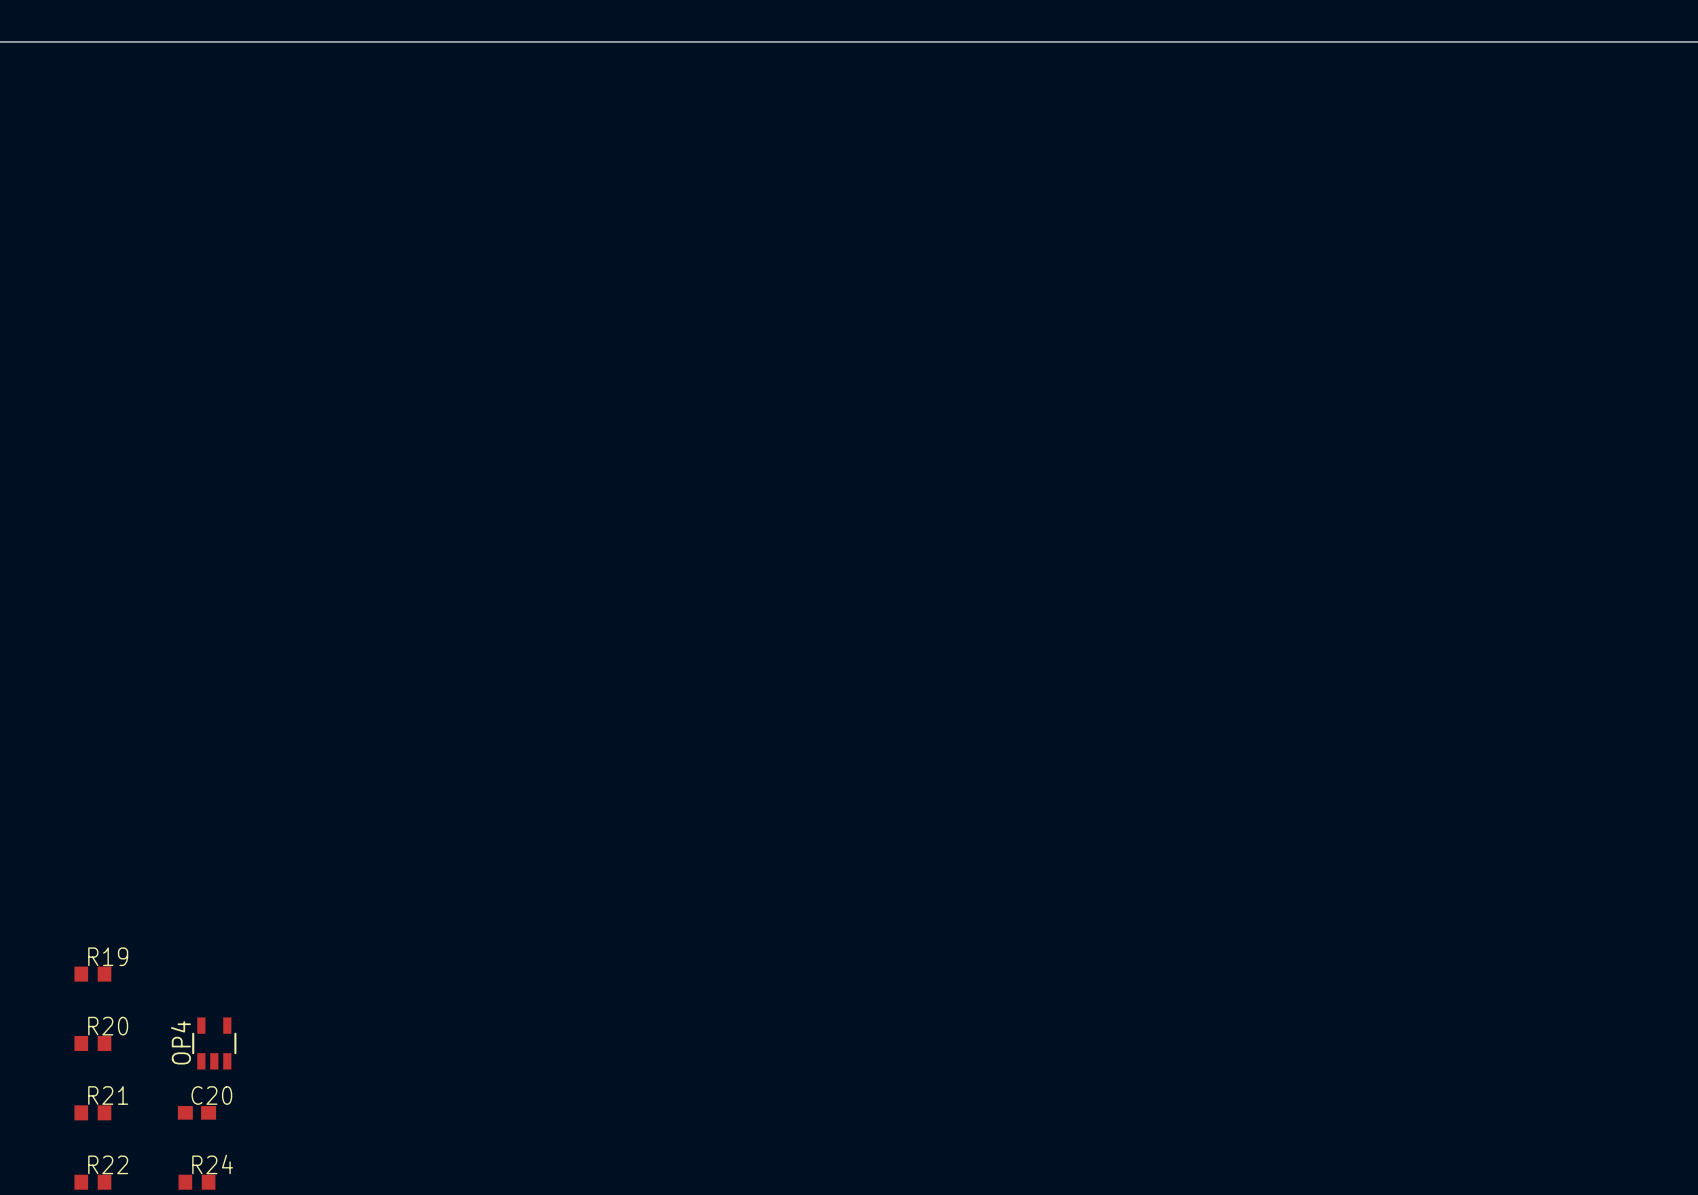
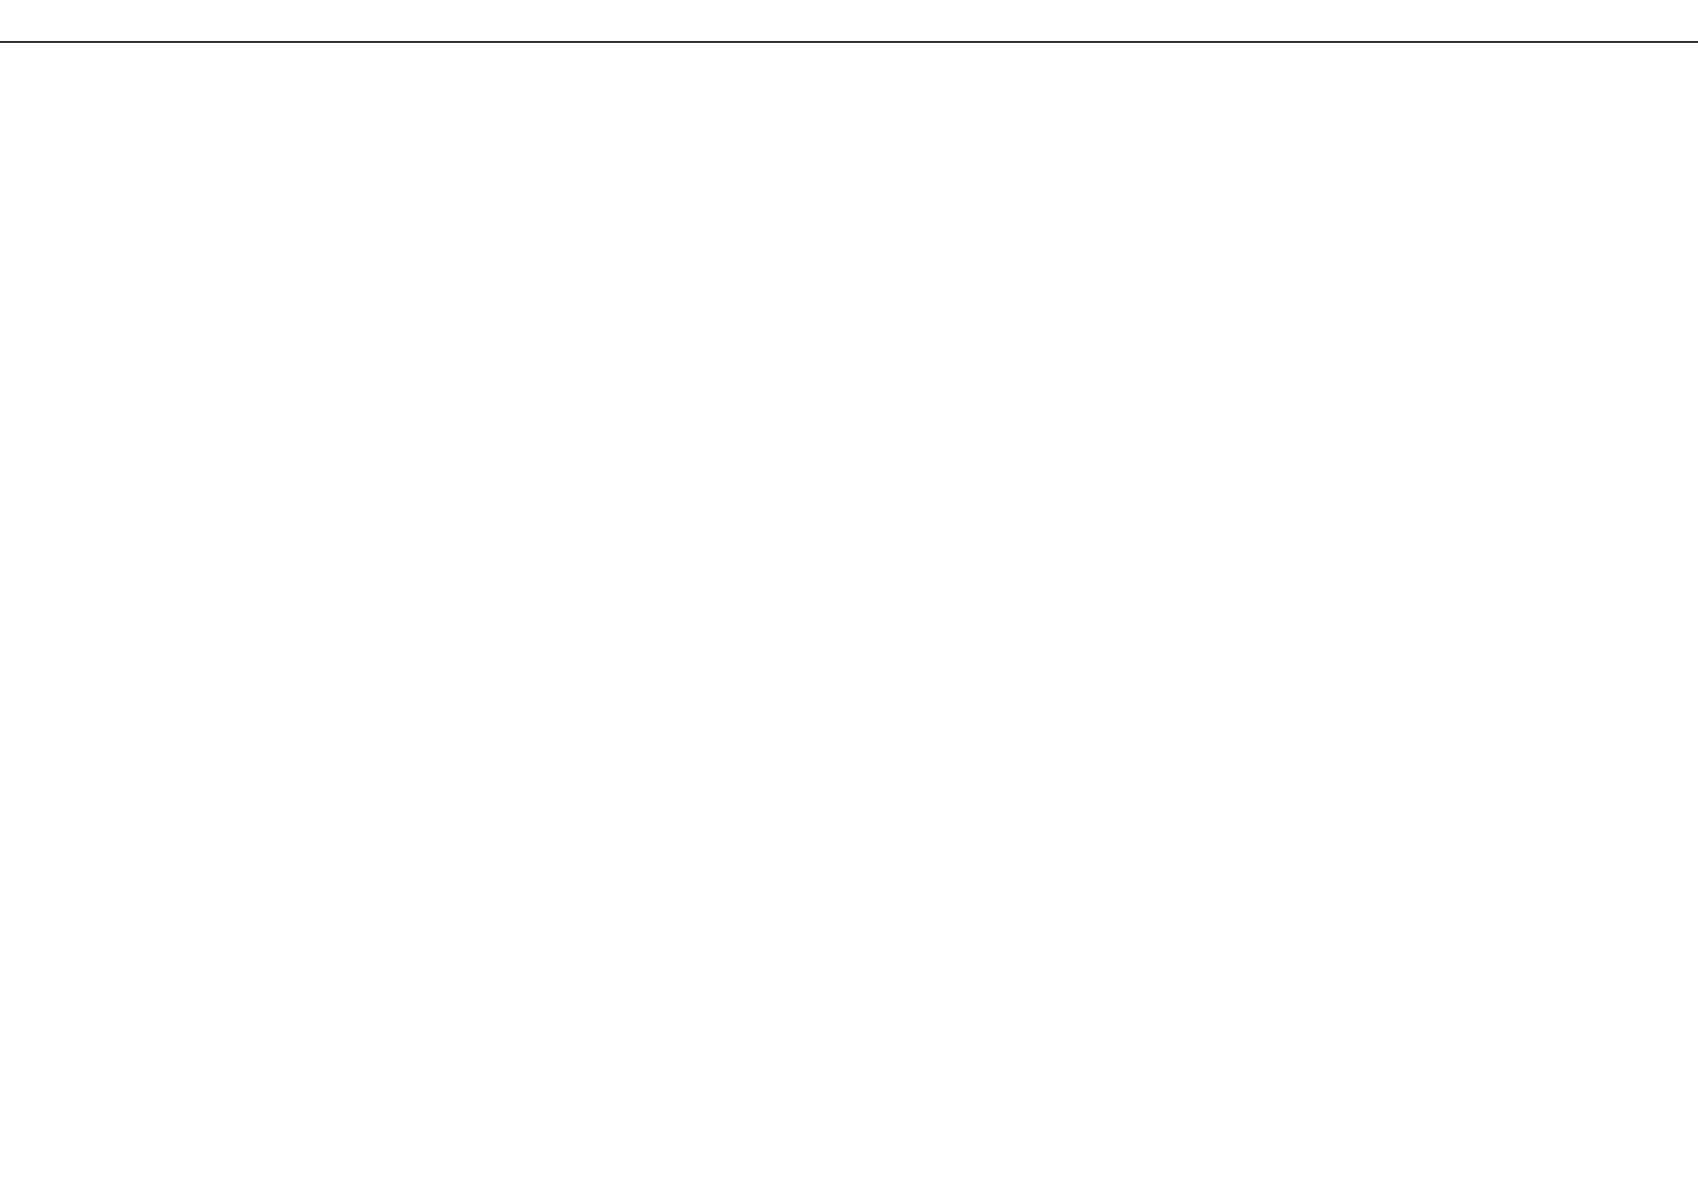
R19: (92, 974) -> none
R20: (92, 1043) -> none
OP4: (214, 1043) -> none
R21: (92, 1112) -> none
C20: (196, 1112) -> none
R22: (92, 1182) -> none
R24: (196, 1182) -> none

